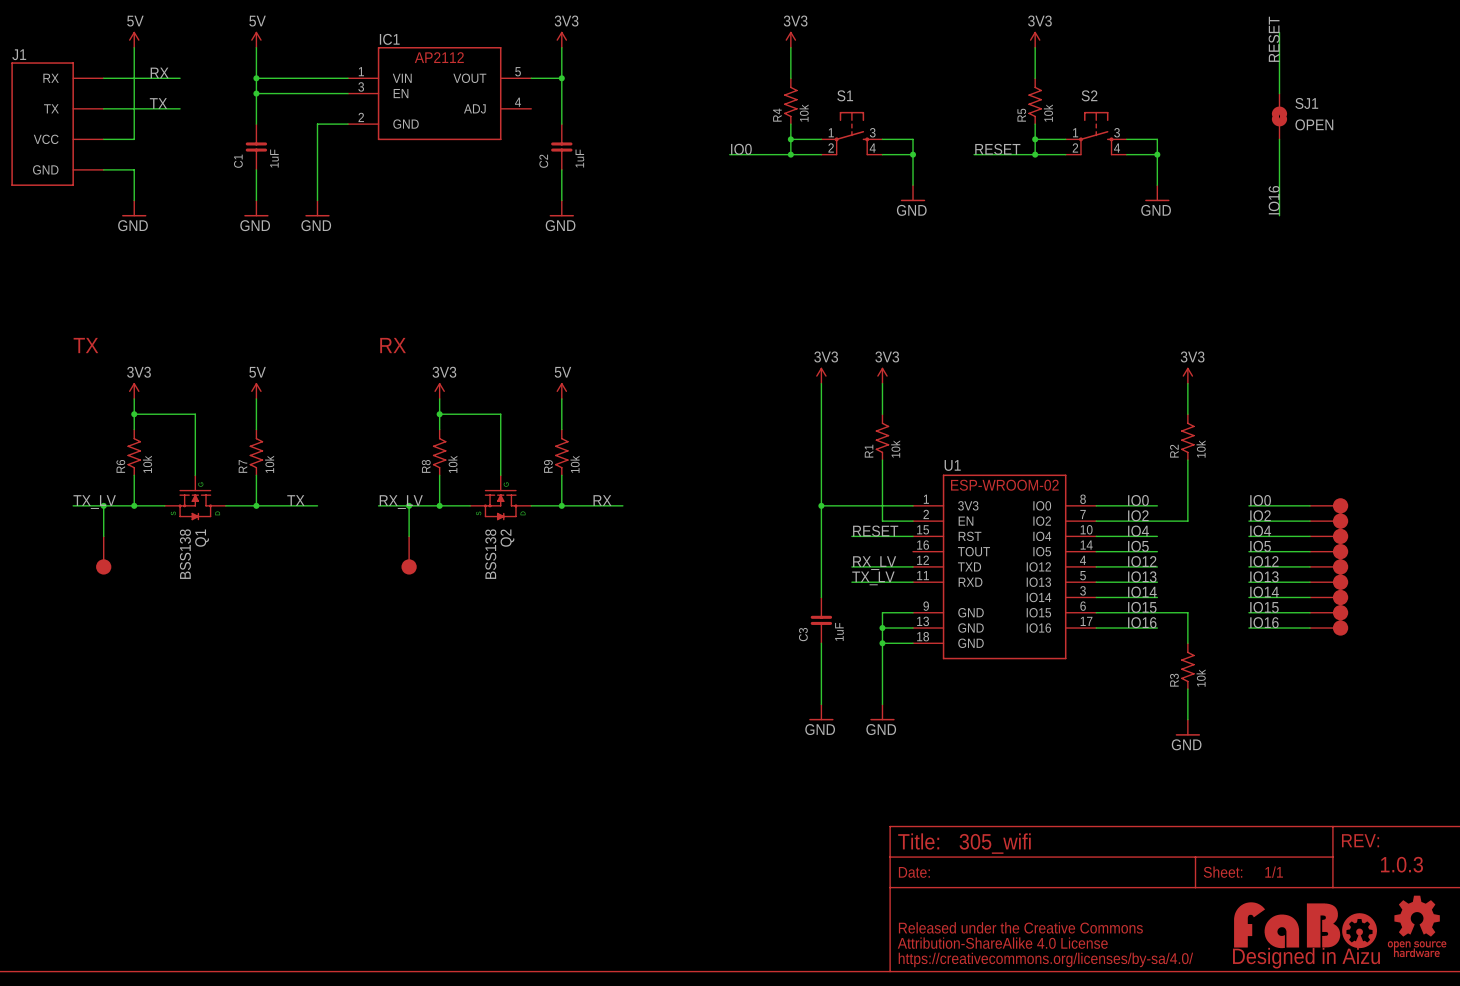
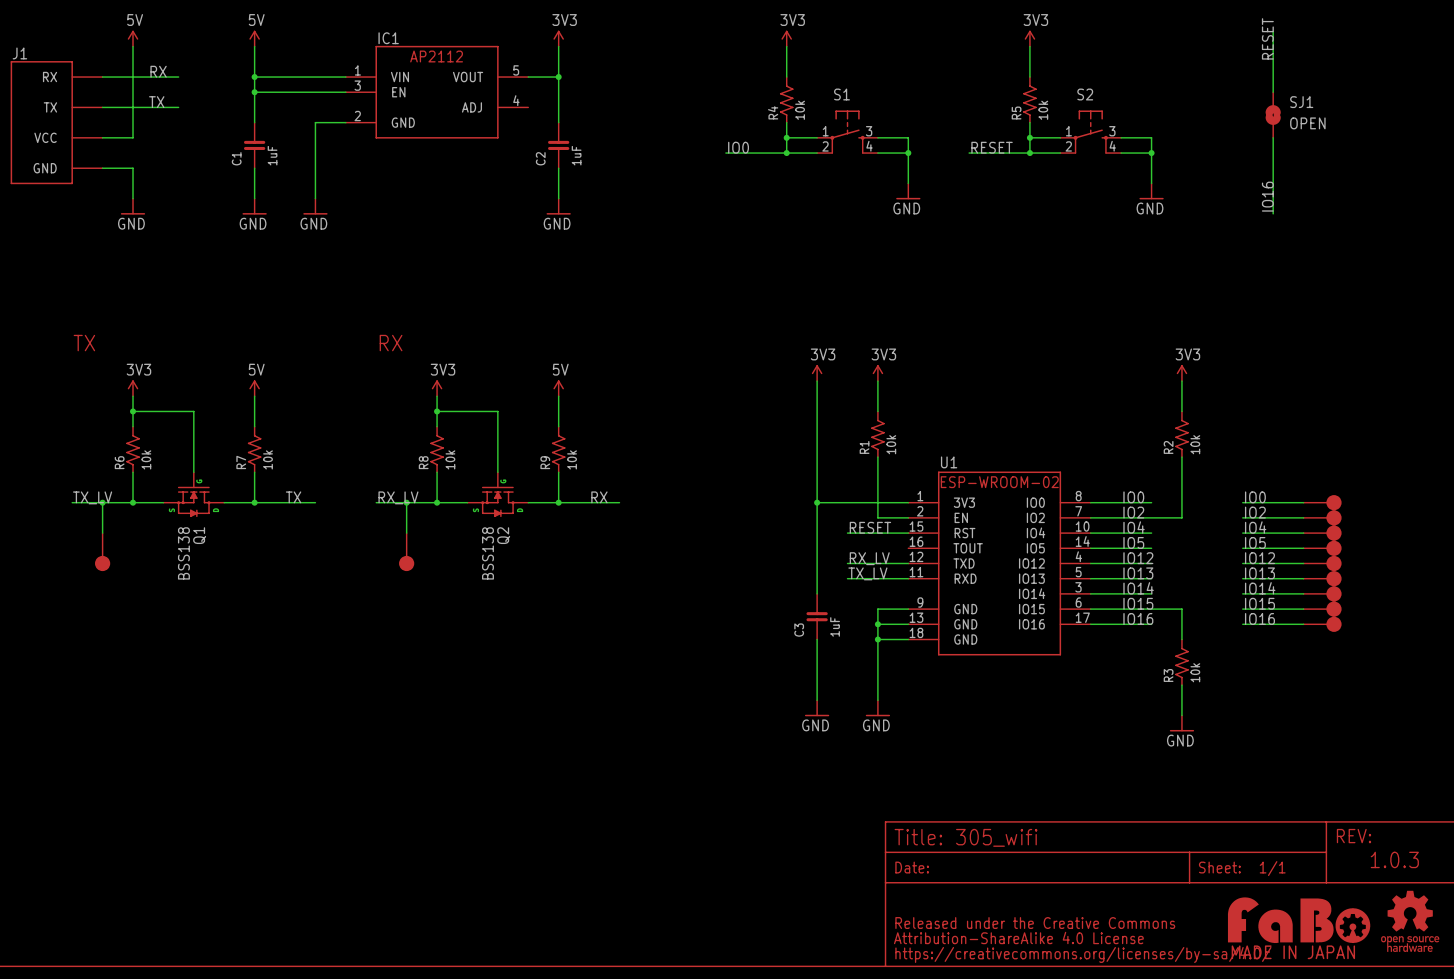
part text: none -> MADE IN JAPAN (1293, 952)
part text: Designed in Aizu (1306, 958) -> none

